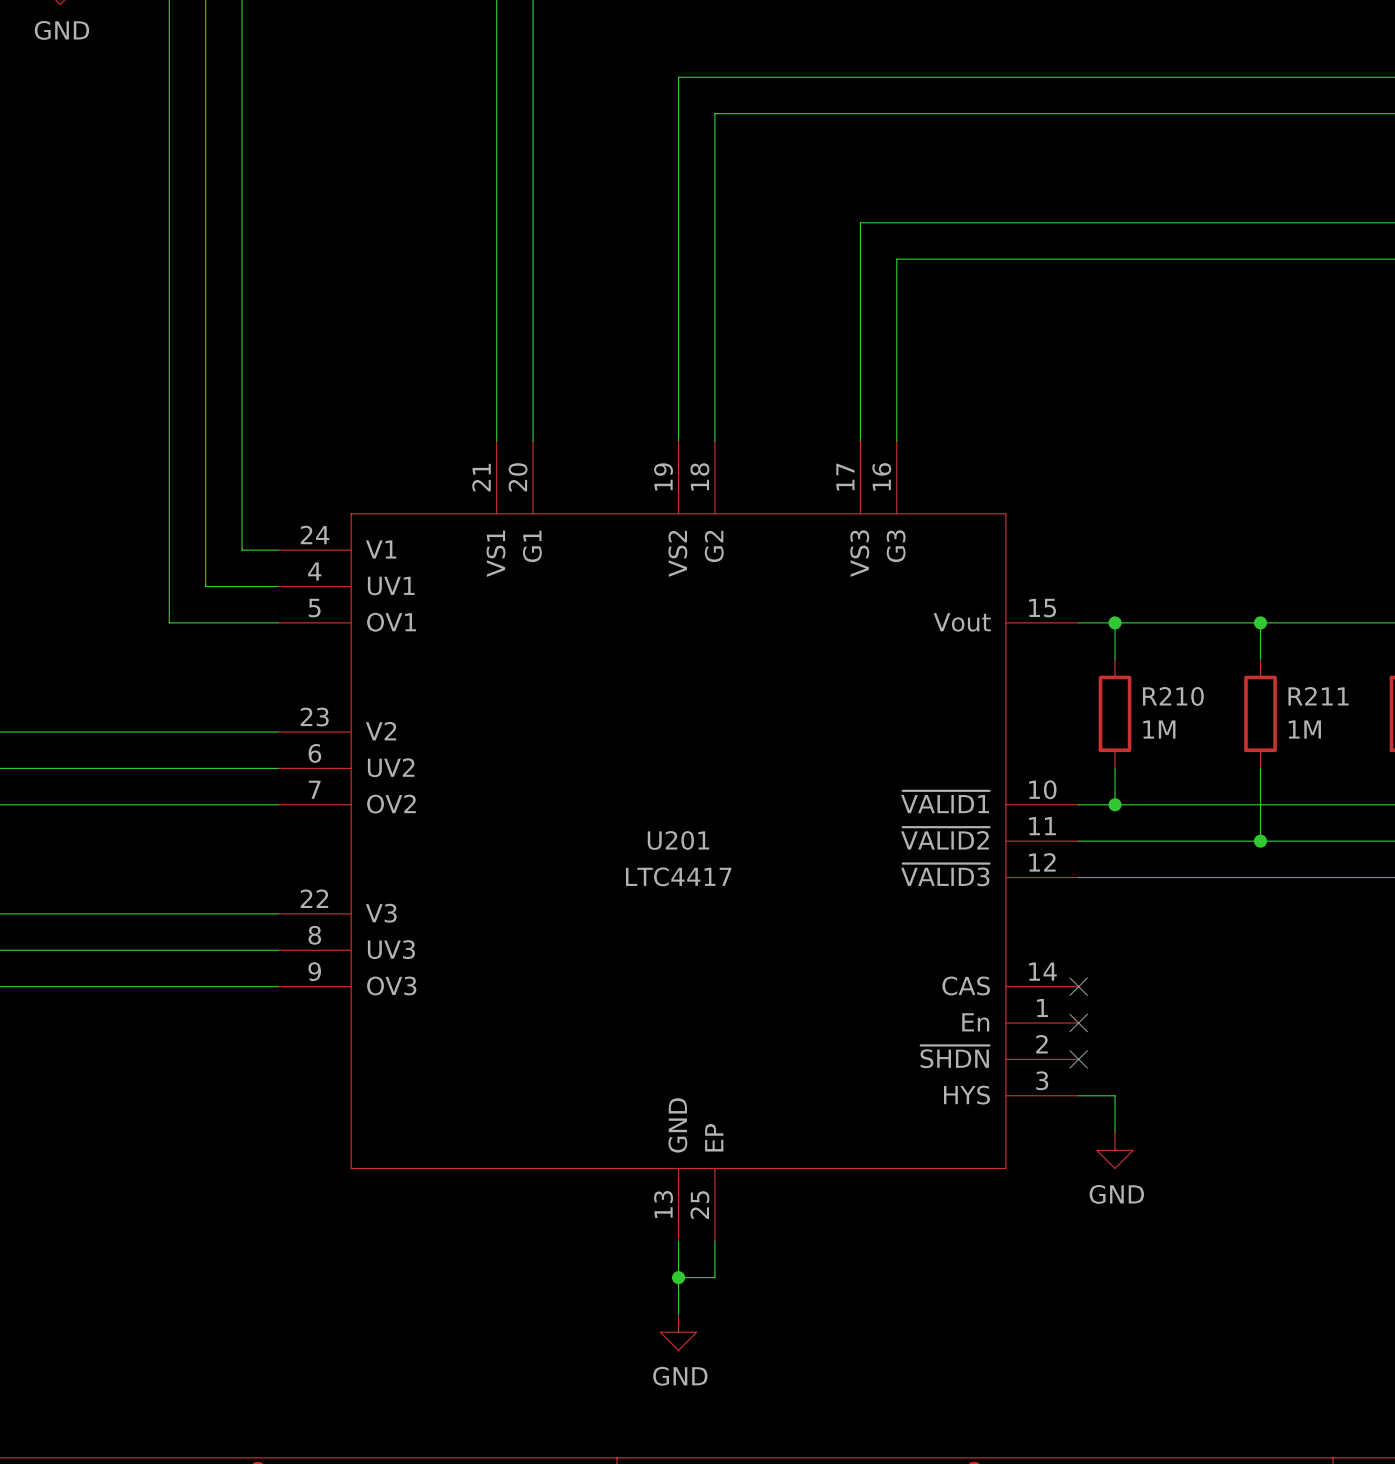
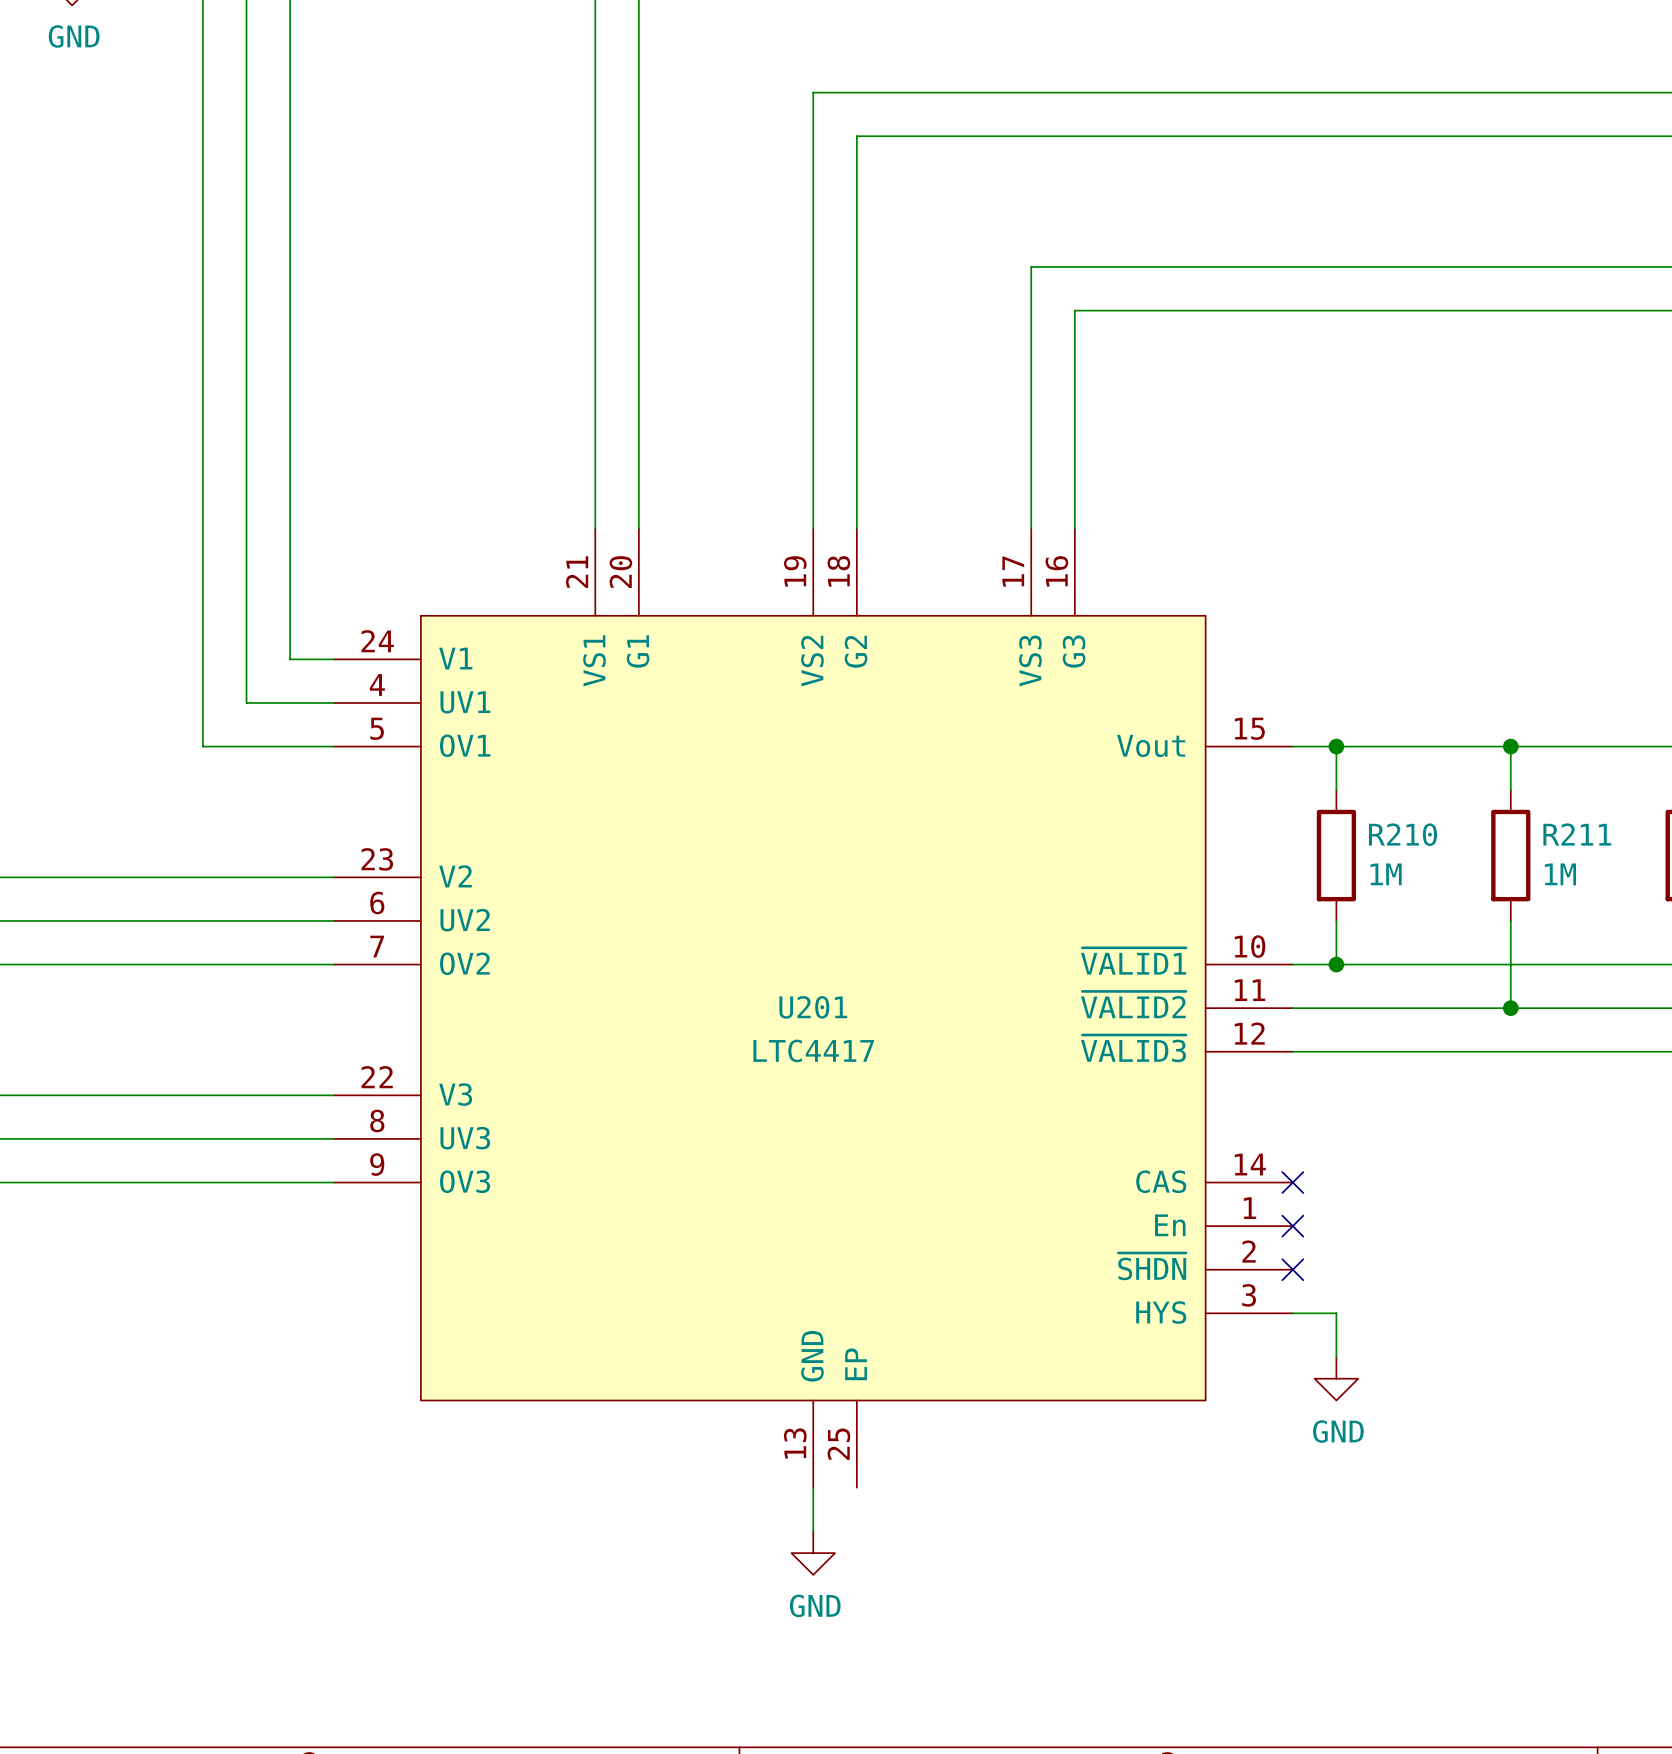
wire: (714, 1241) (714, 1277) (678, 1277) (678, 1314) -> none
junction: (678, 1277) -> none
power symbol position: GND (678, 1332) -> GND (813, 1553)

